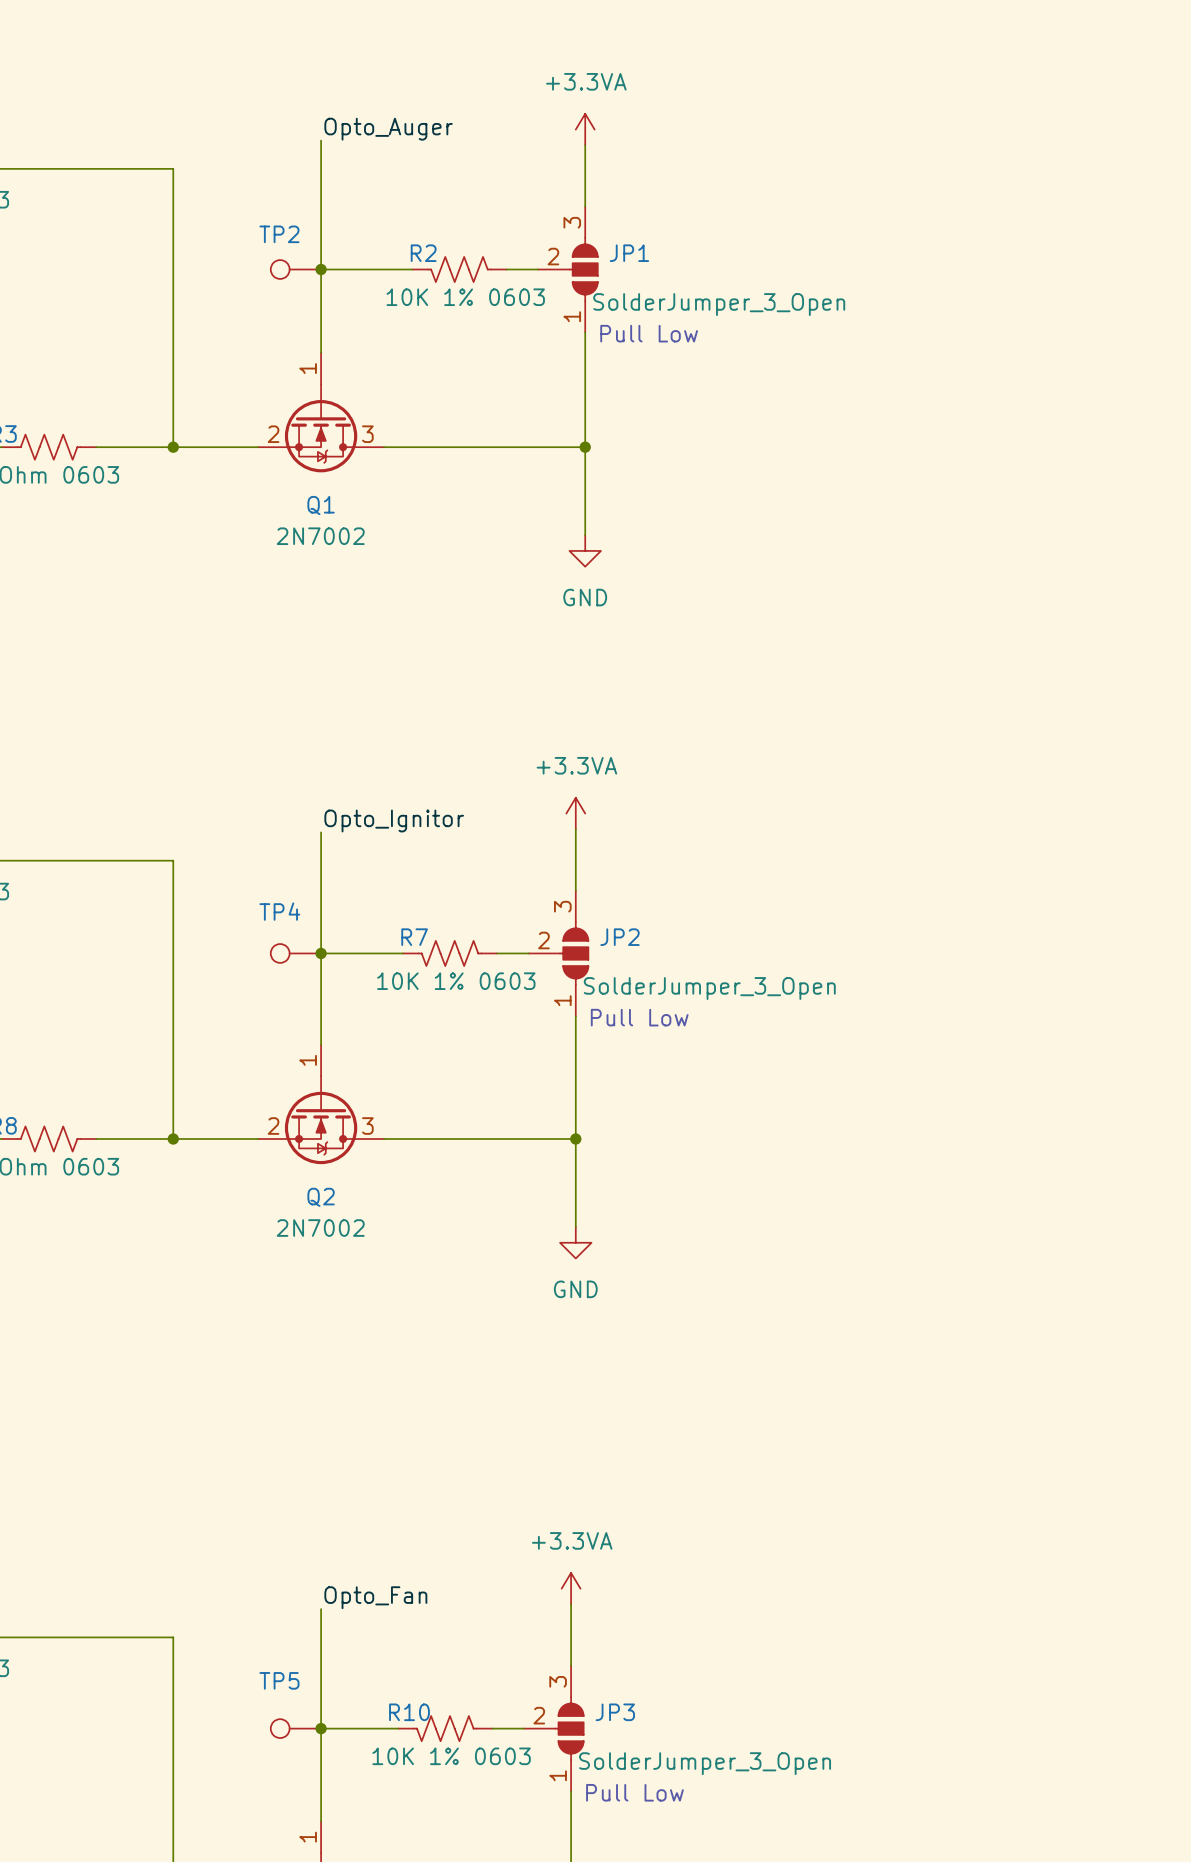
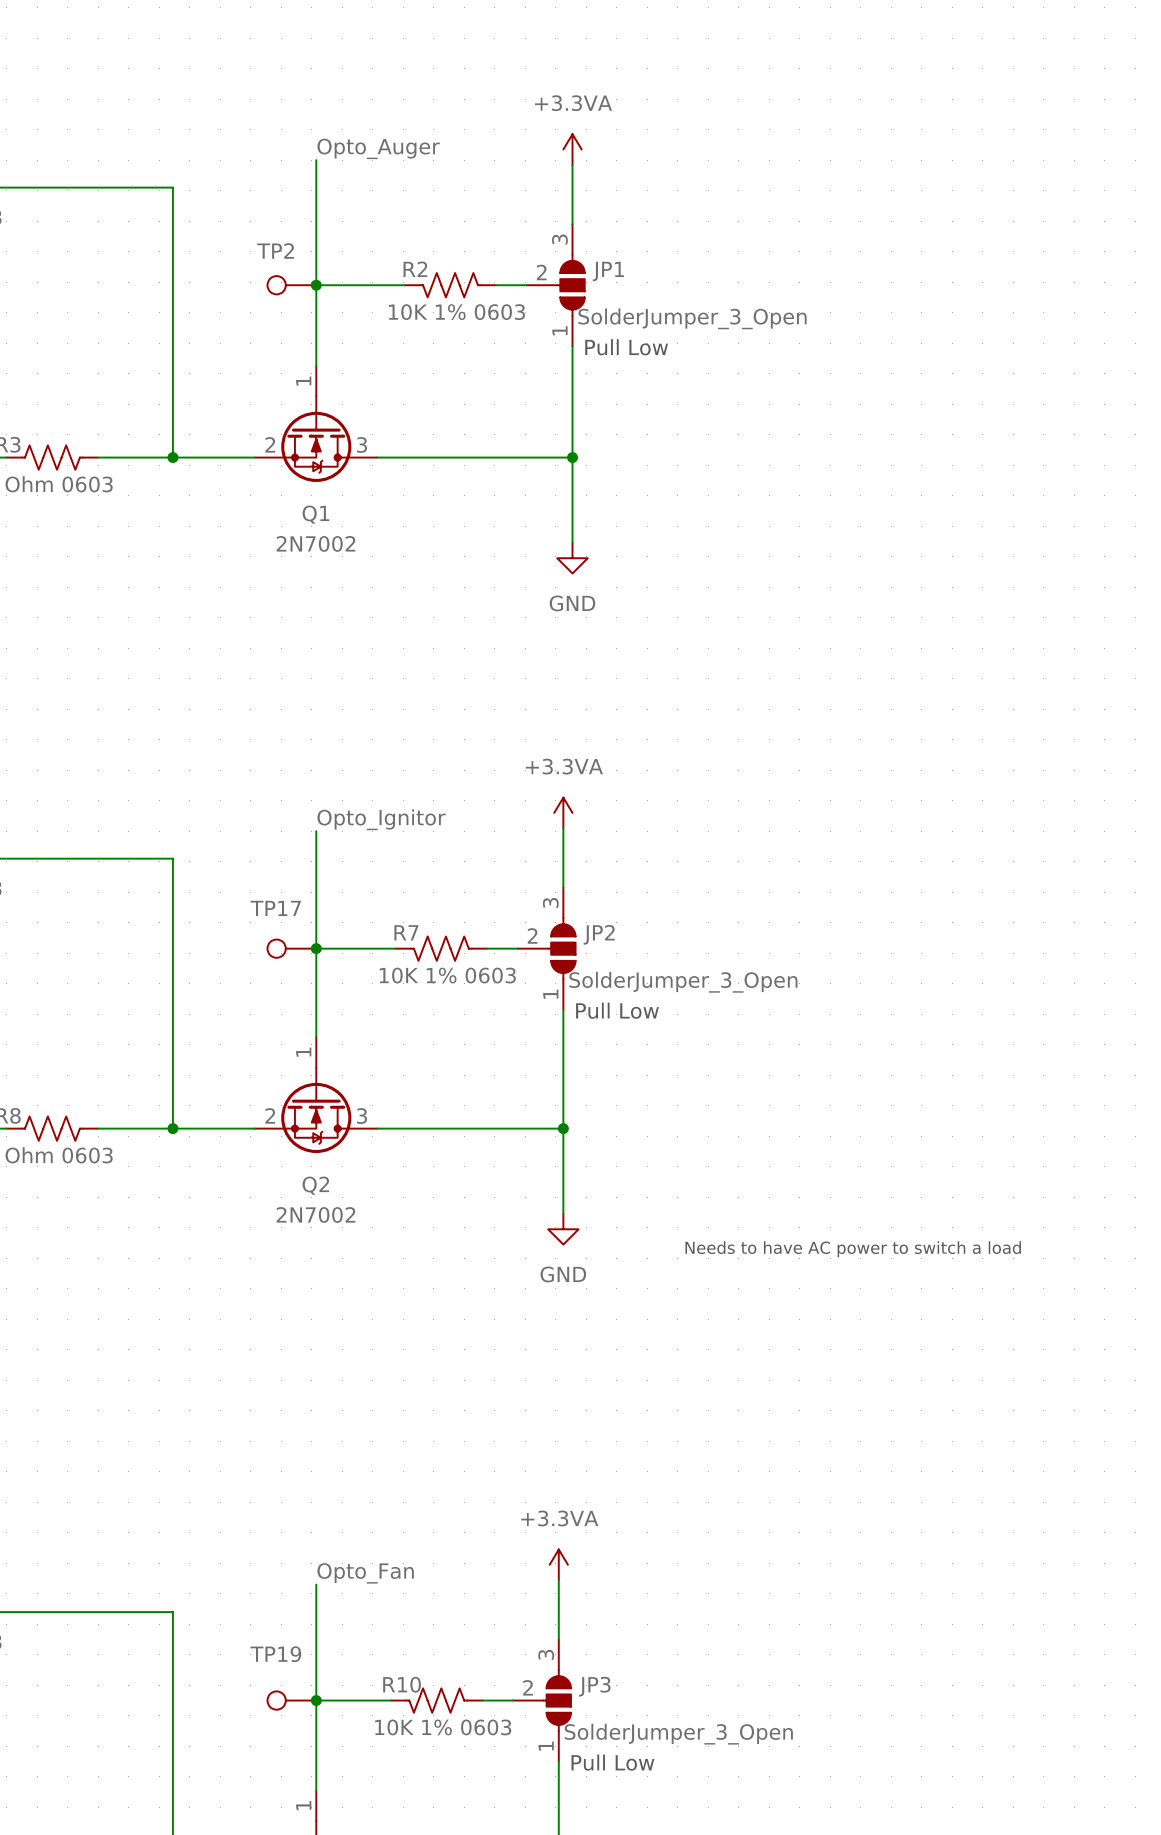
TP4 name: TP4 (279, 911) -> TP17 (275, 908)
text: none -> Needs to have AC power to switch a load (853, 1249)
TP5 name: TP5 (279, 1680) -> TP19 (275, 1654)

